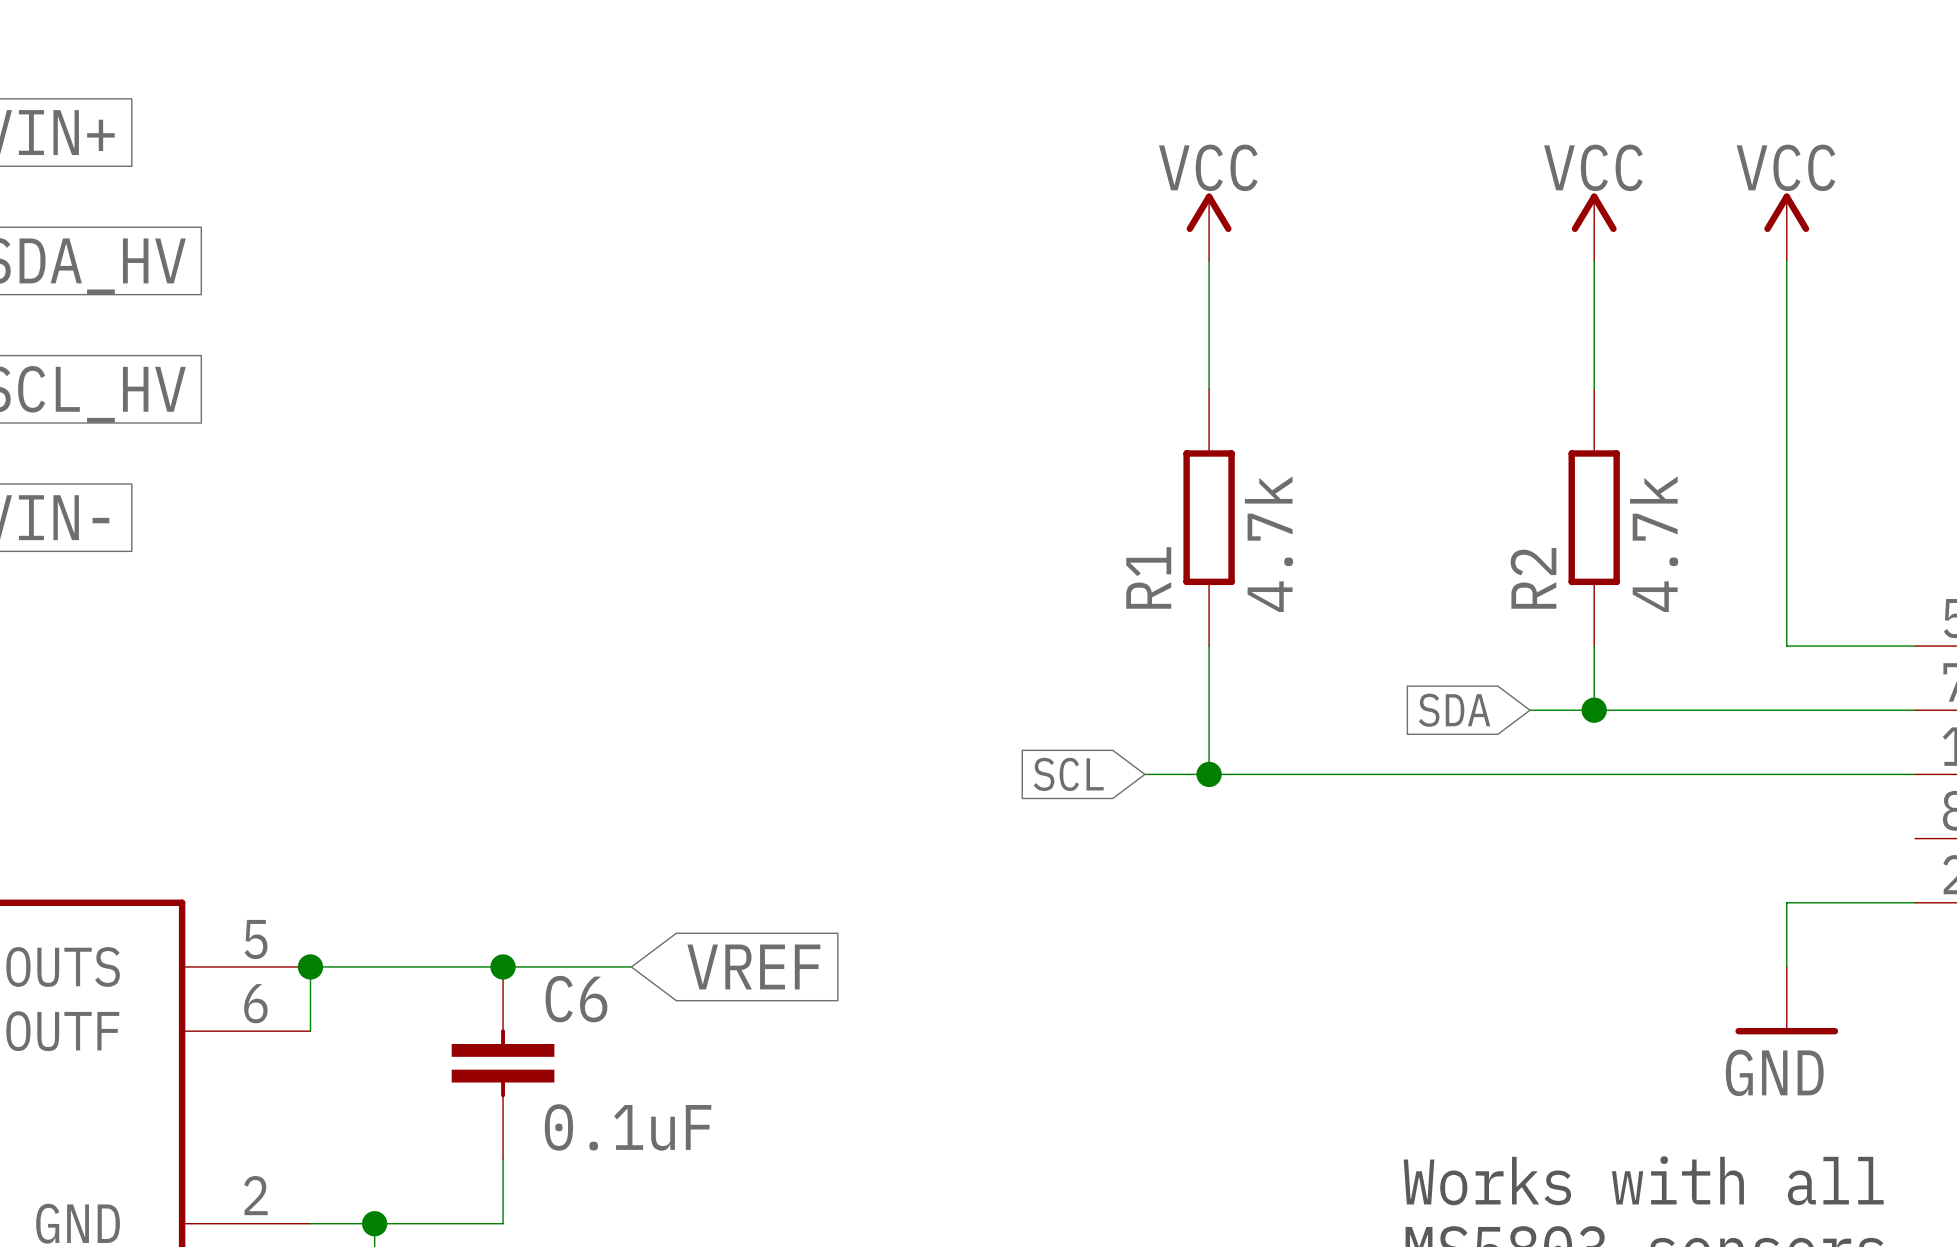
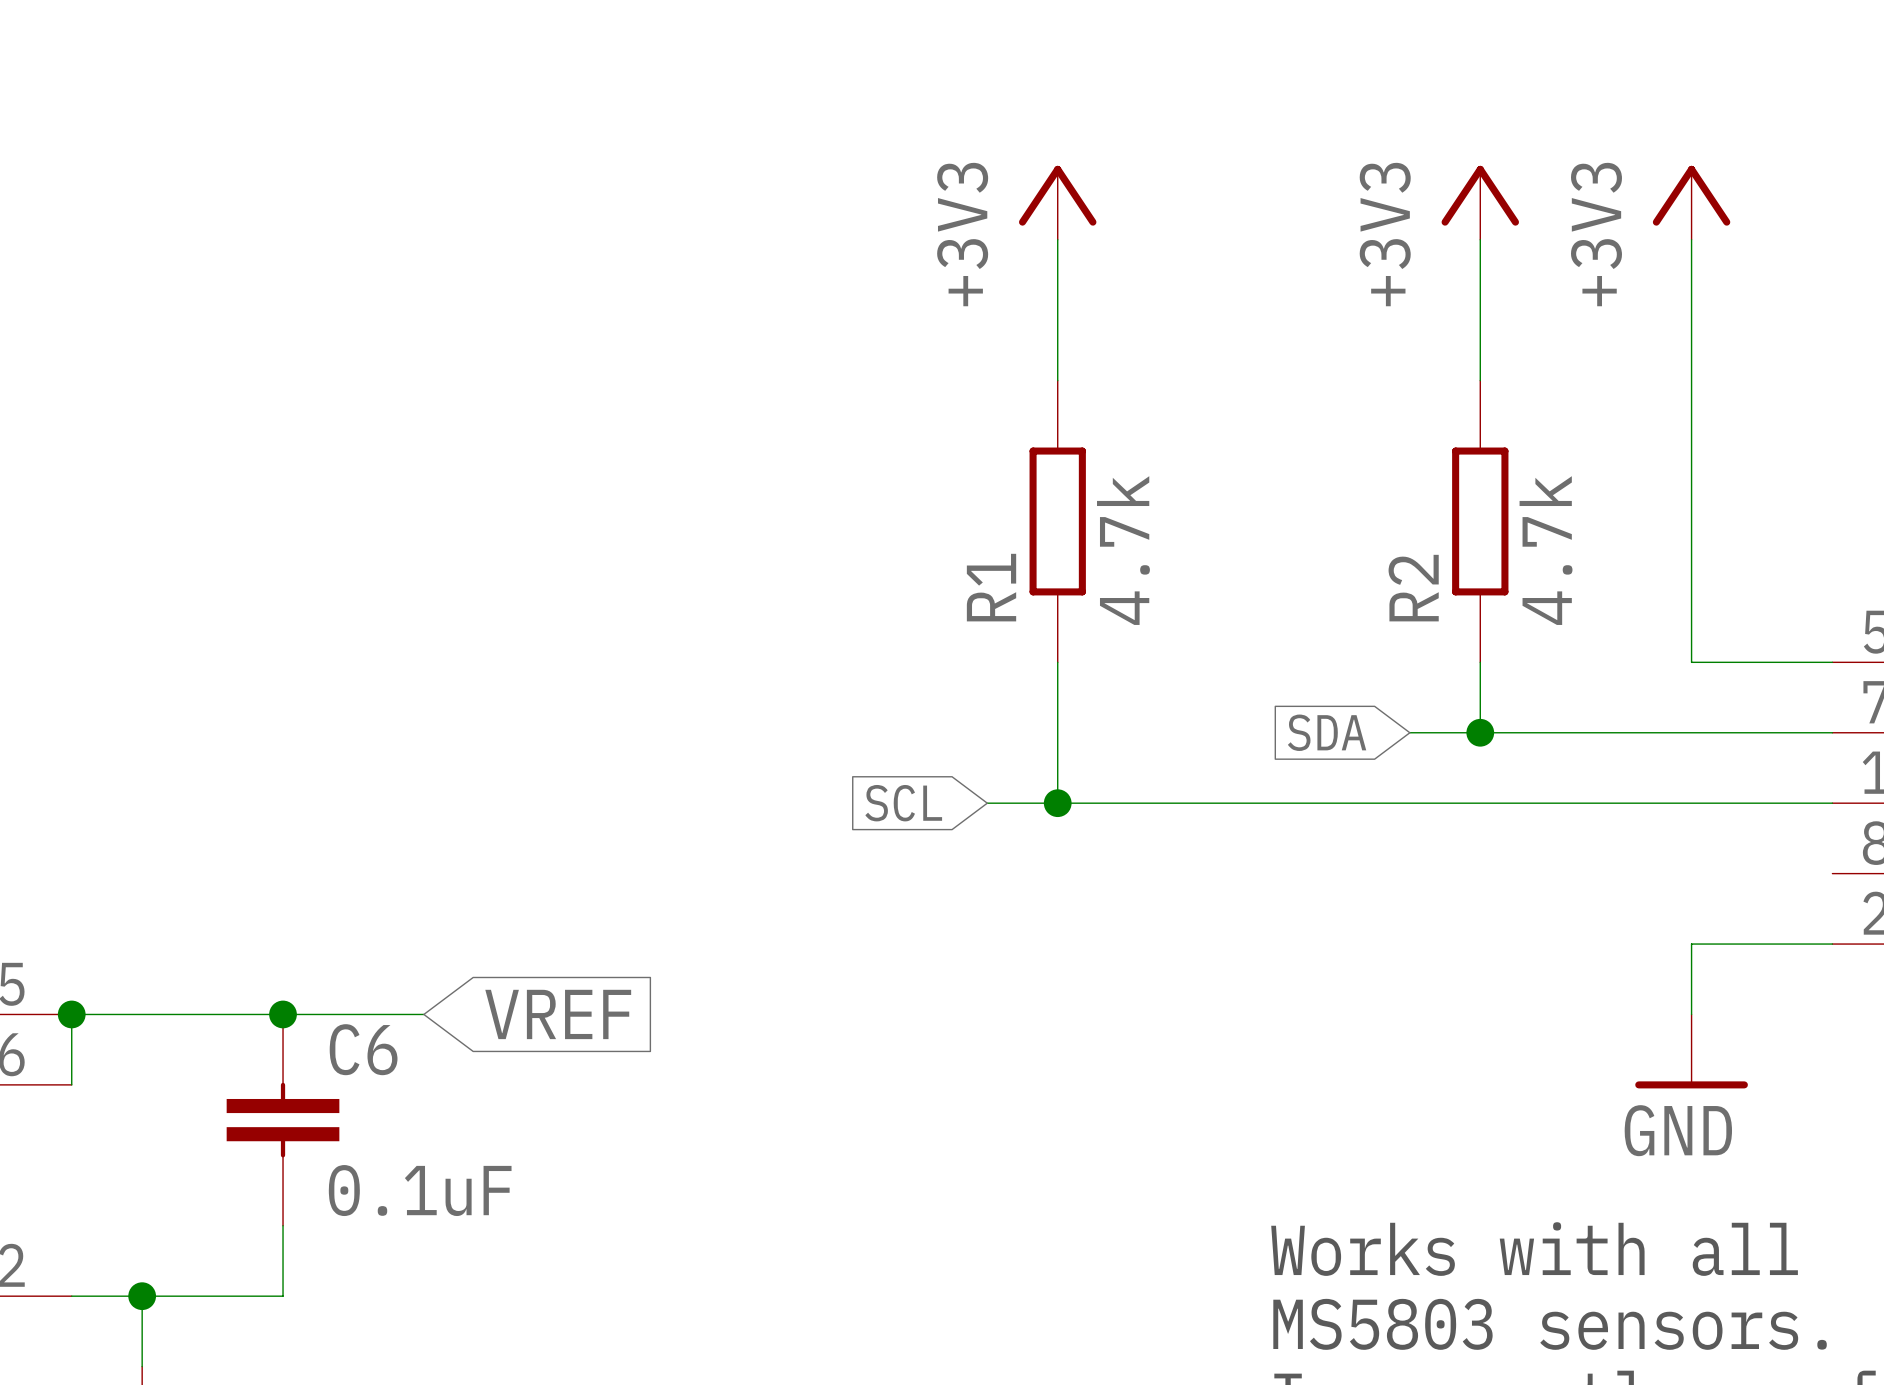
power symbol: VCC (1209, 227) -> +3V3 (1057, 202)
power symbol: VCC (1594, 227) -> +3V3 (1480, 202)
power symbol: VCC (1786, 227) -> +3V3 (1691, 202)

